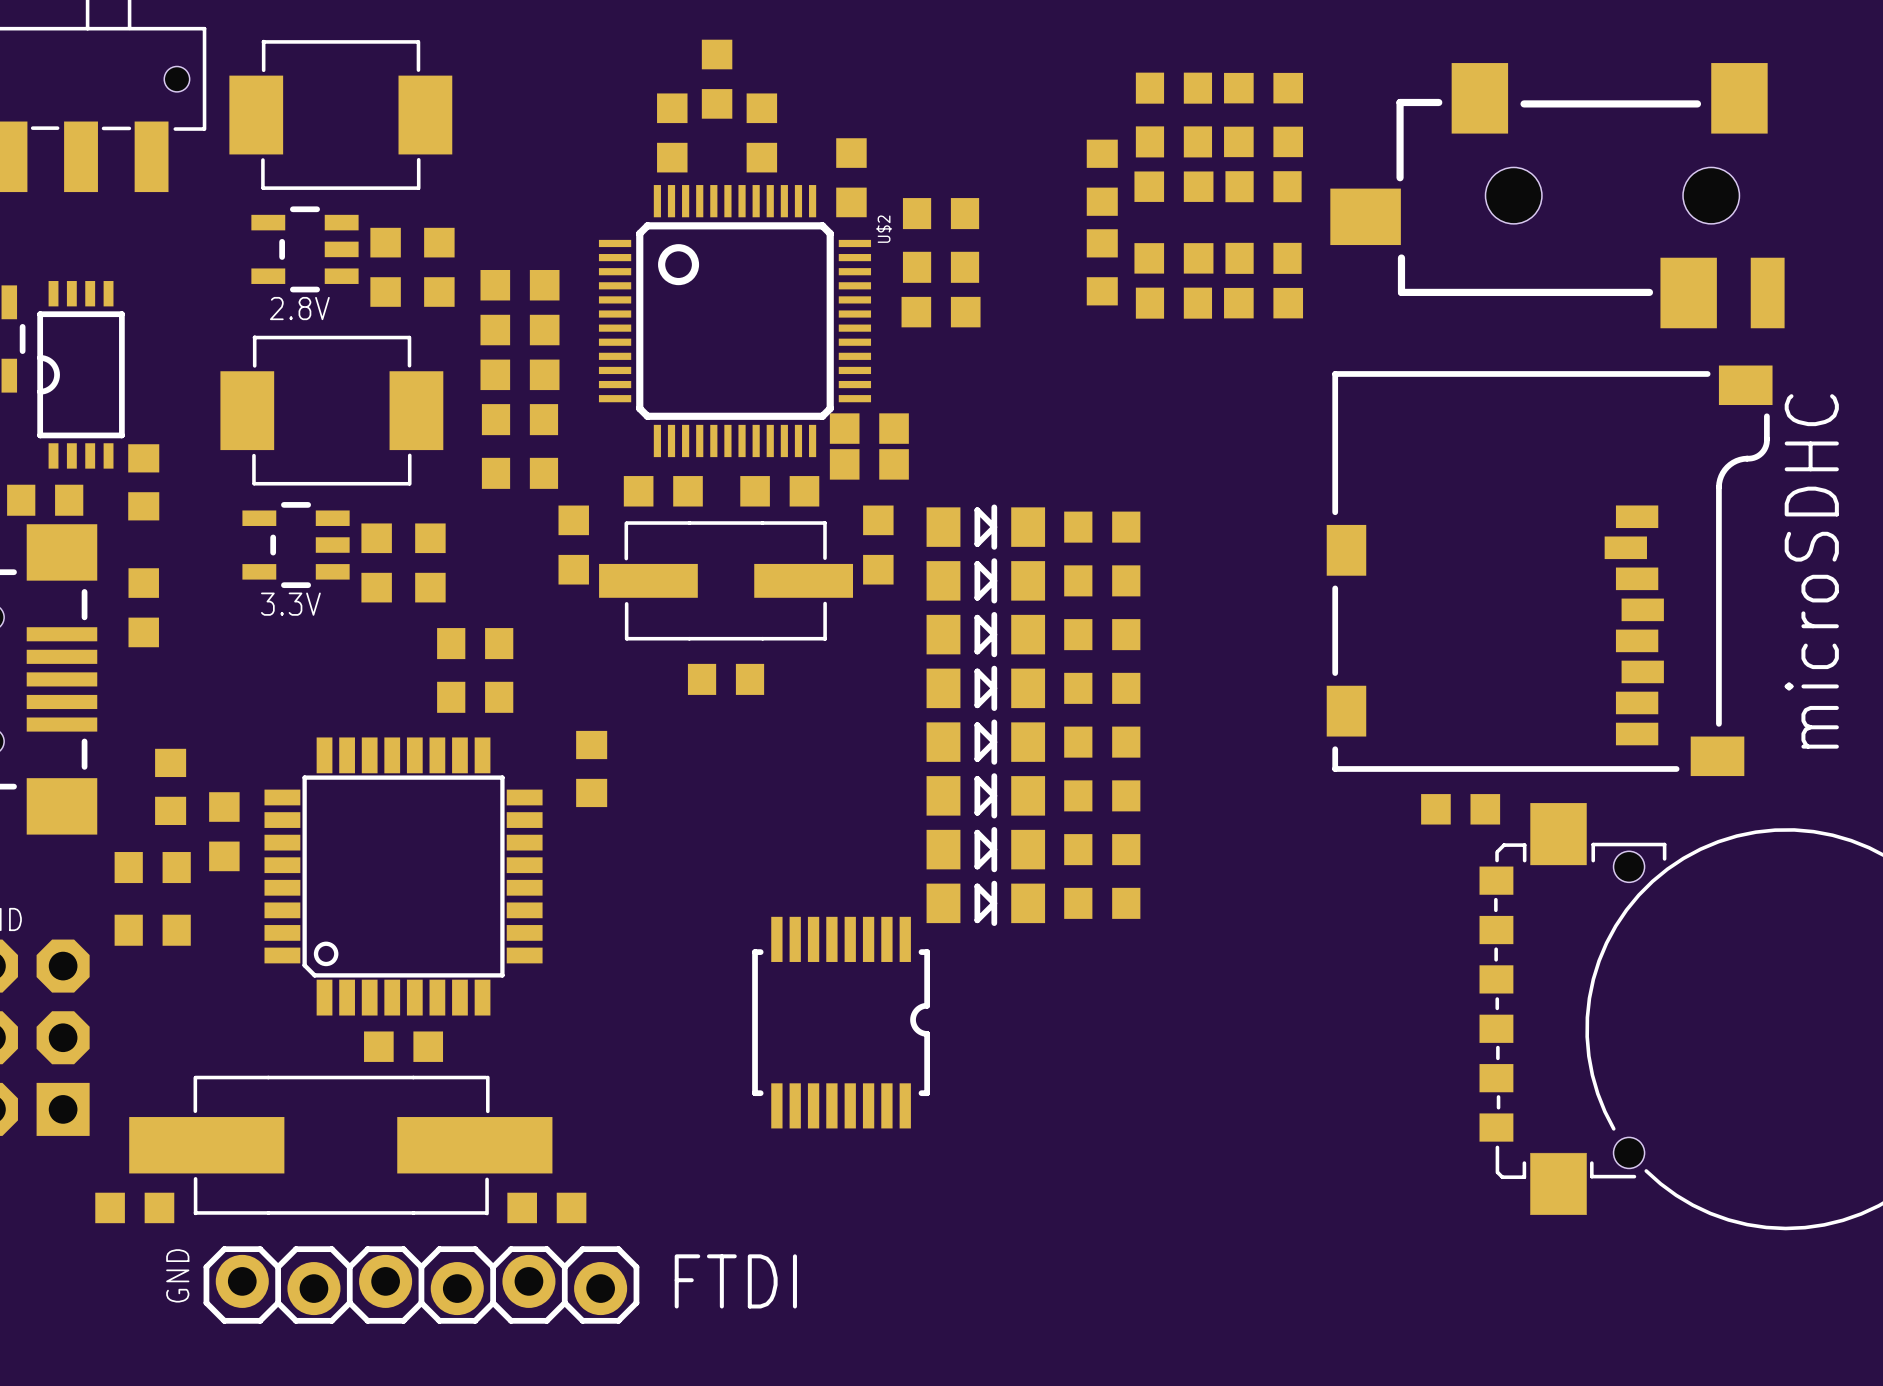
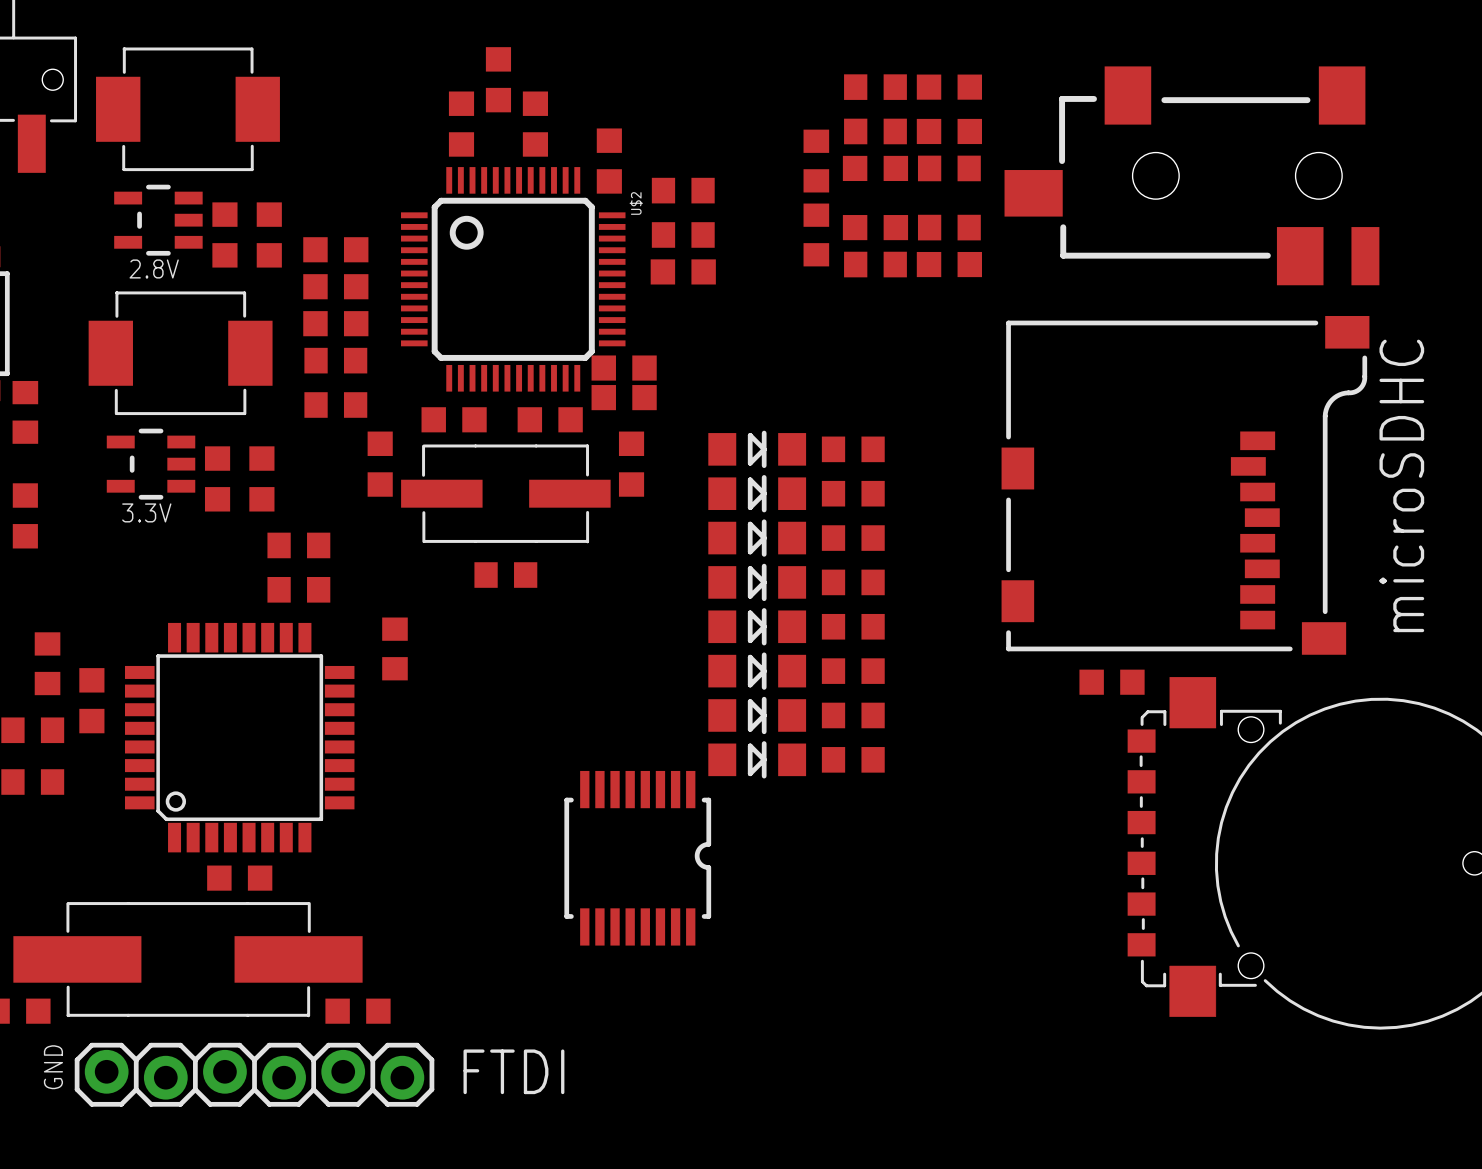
part: (985, 527) -> none
part: none -> (757, 449)
part: (1102, 527) -> none
part: none -> (853, 449)
part: (985, 580) -> none
part: none -> (757, 493)
part: (1102, 580) -> none
part: none -> (853, 493)
part: (985, 634) -> none
part: none -> (757, 538)
part: (1102, 634) -> none
part: none -> (853, 538)
part: (985, 688) -> none
part: none -> (757, 582)
part: (1102, 688) -> none
part: none -> (853, 582)
part: (985, 742) -> none
part: none -> (757, 626)
part: (1102, 742) -> none
part: none -> (853, 626)
part: (985, 795) -> none
part: none -> (757, 671)
part: (1102, 795) -> none
part: none -> (853, 671)
part: (985, 849) -> none
part: none -> (757, 715)
part: (1102, 849) -> none
part: none -> (853, 715)
part: (985, 903) -> none
part: none -> (757, 759)
part: (1102, 903) -> none
part: none -> (853, 759)
part position: (841, 1022) -> (637, 858)

